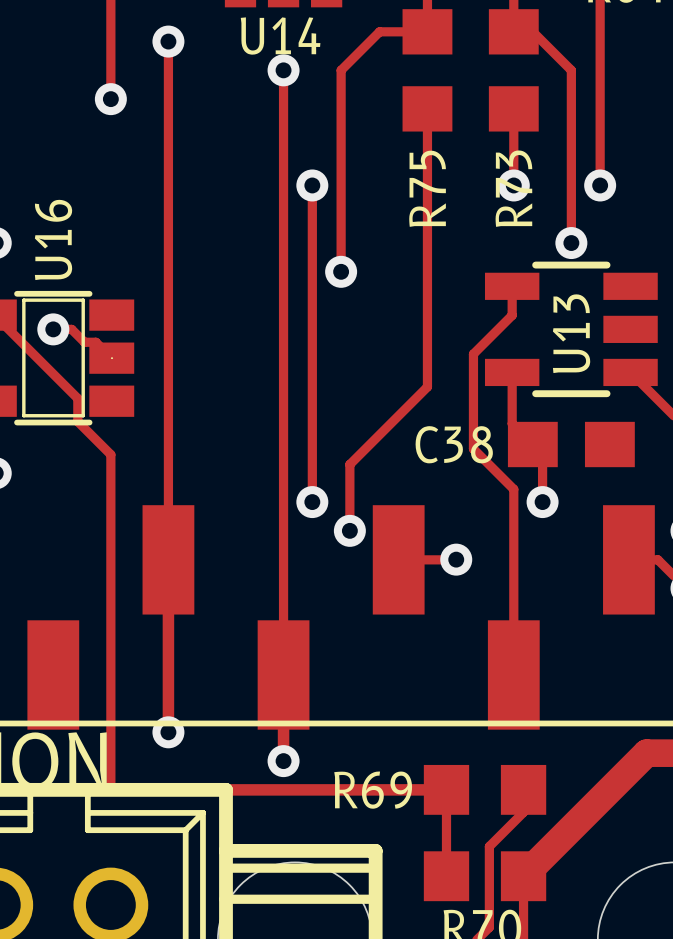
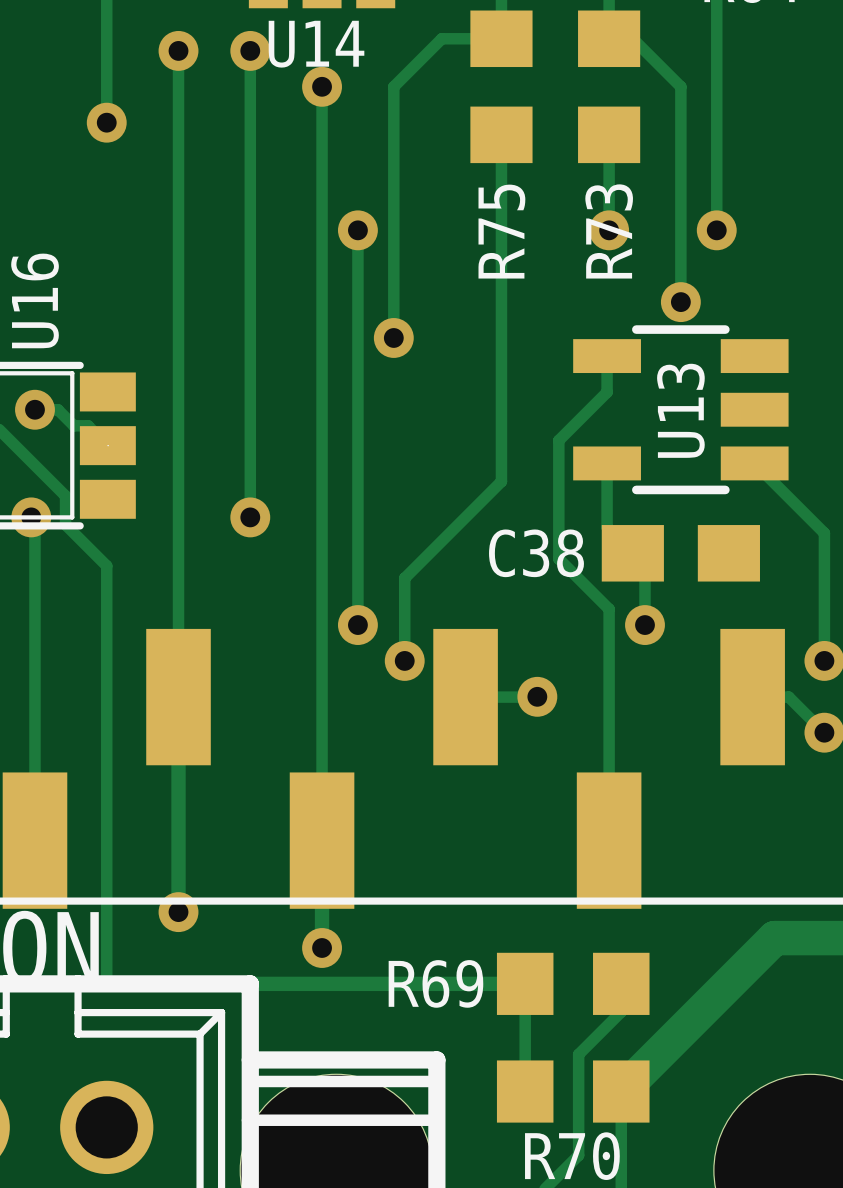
track: none -> (250, 50) (250, 517)
via: none -> (250, 50)
track: none -> (31, 517) (34, 521) (34, 840)
via: none -> (31, 517)
via: none -> (250, 517)

